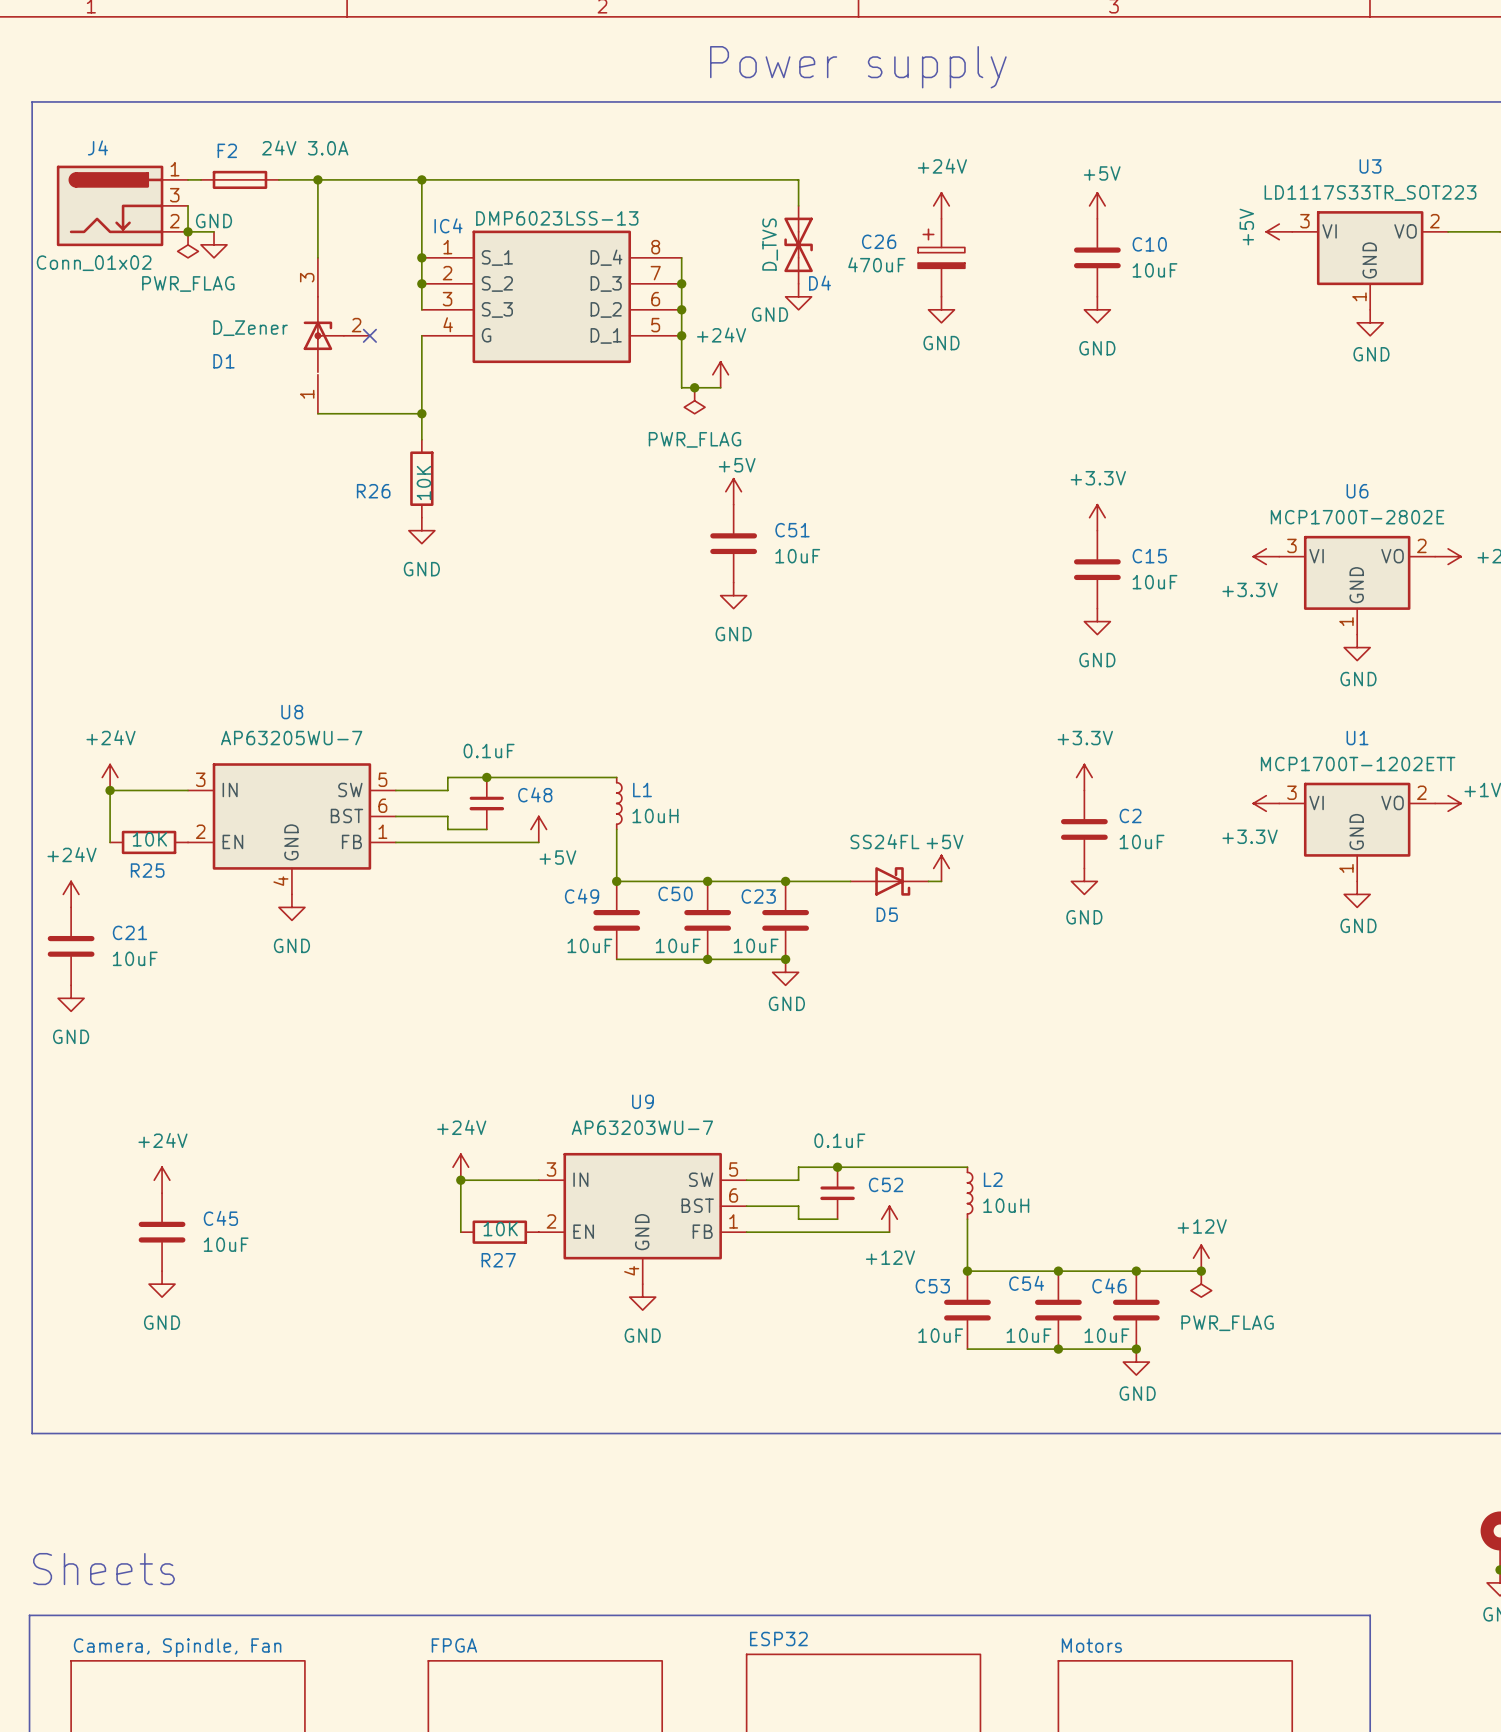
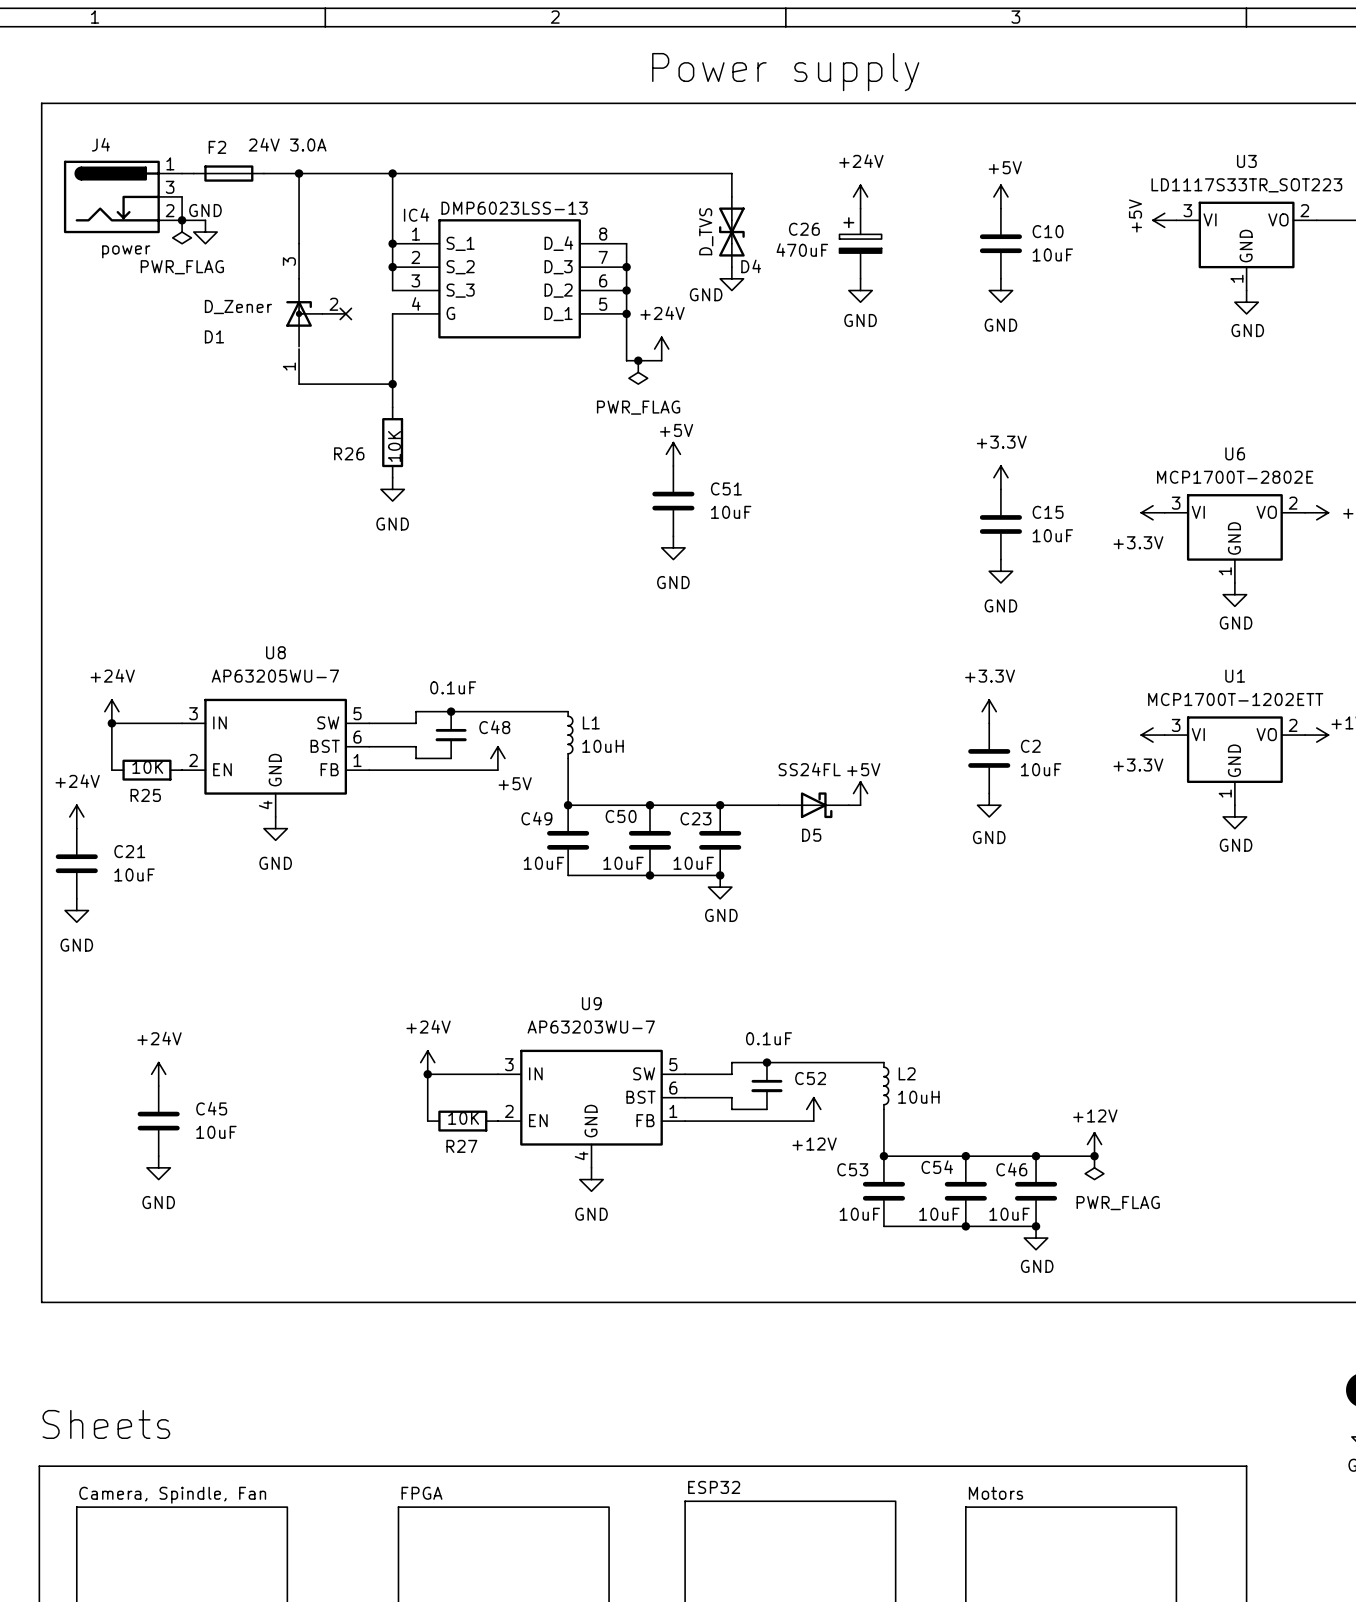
J4 value: Conn_01x02 (94, 263) -> power (126, 251)

